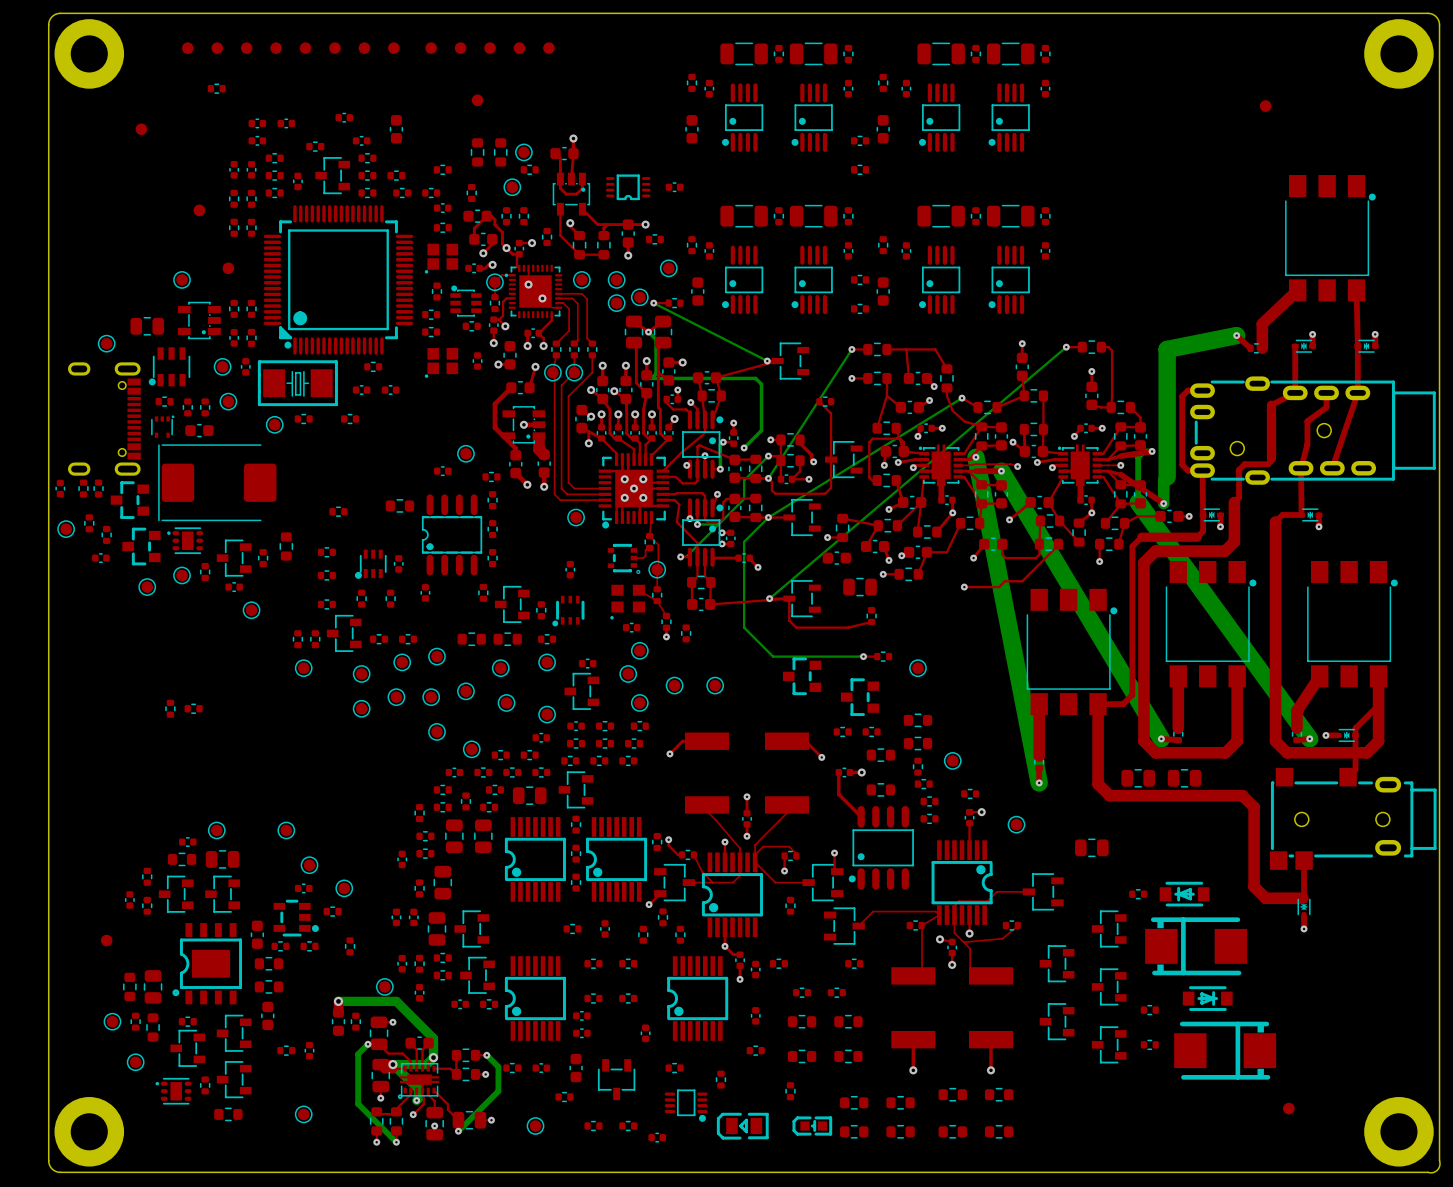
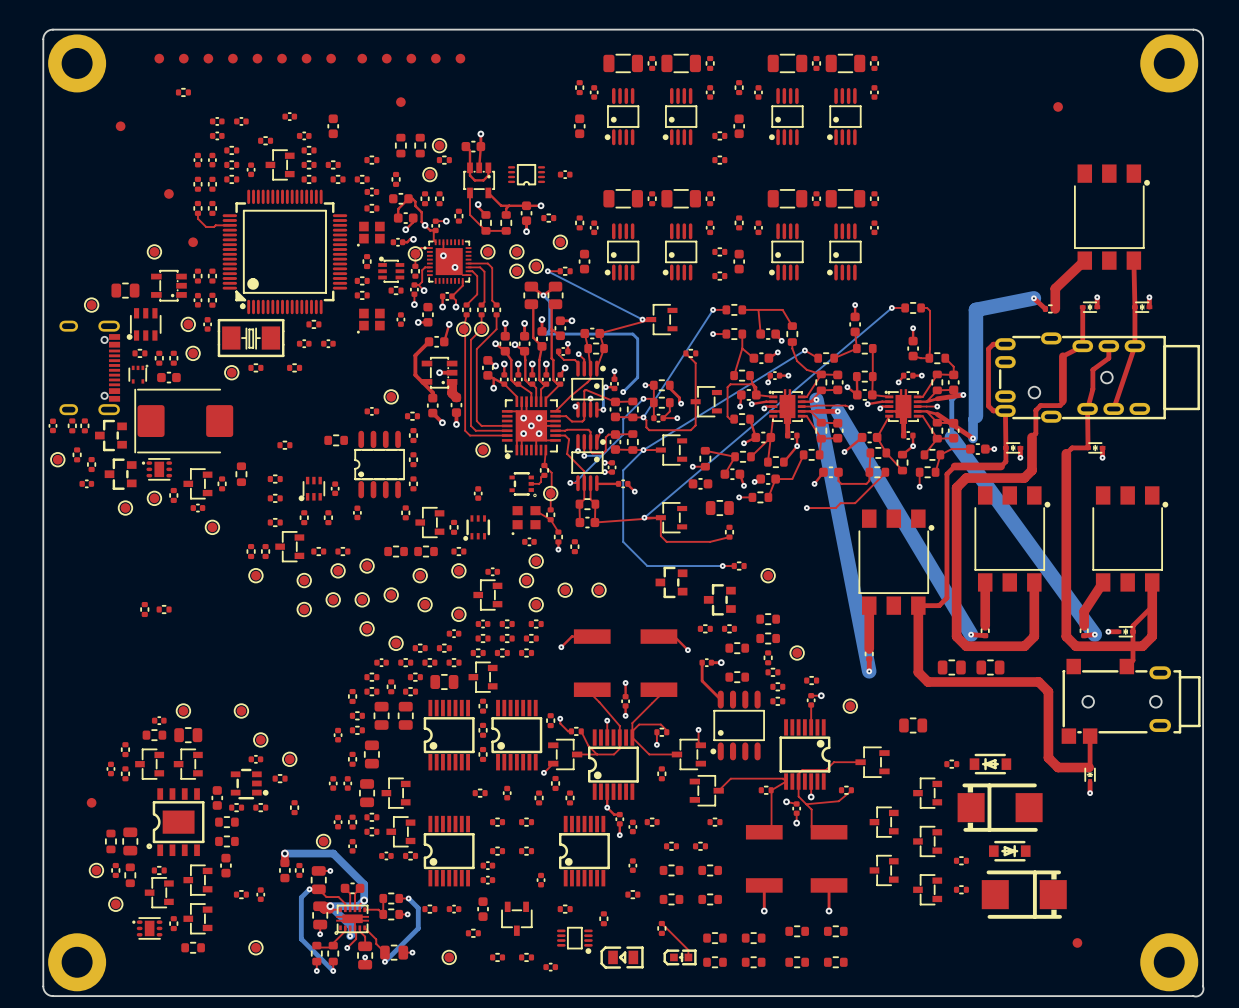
top track: none -> (197, 213) (197, 218) (206, 227) (229, 225)
top track: none -> (661, 923) (688, 950) (688, 957)

